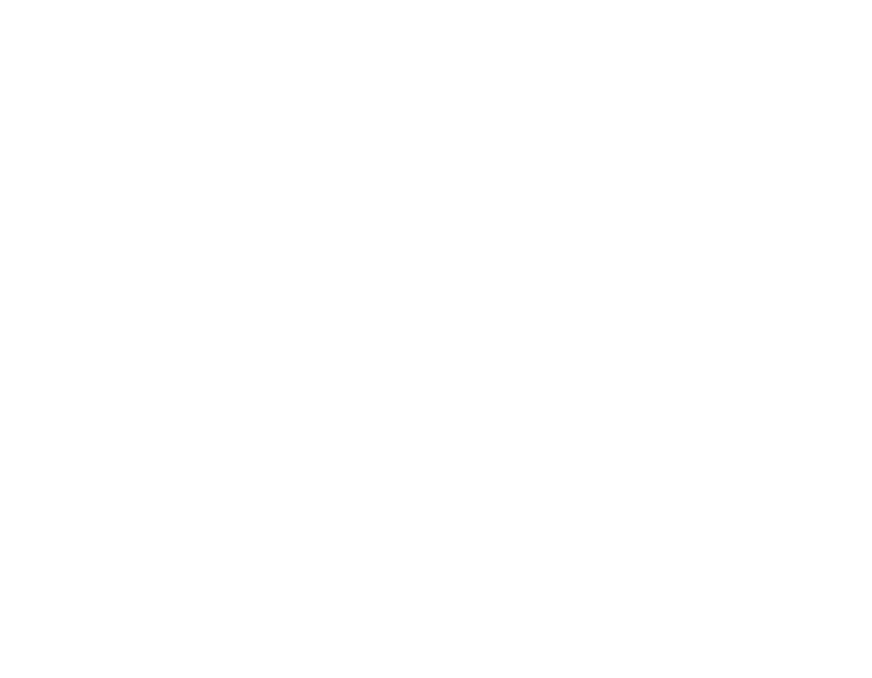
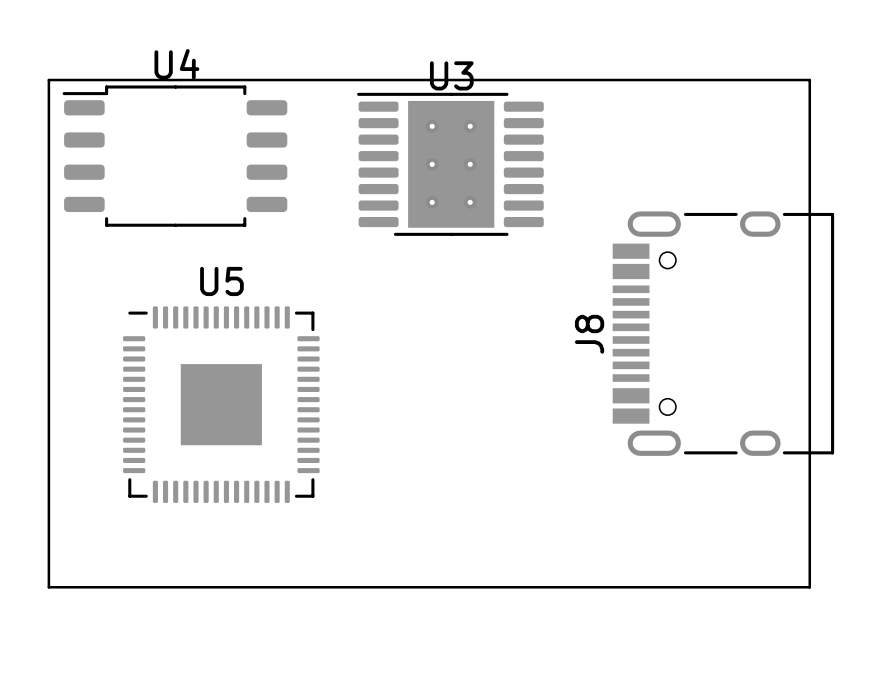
board edge: none -> (48, 80) (809, 80) (809, 587) (48, 587) (48, 80)
U4: none -> (174, 156)
U3: none -> (450, 164)
J8: none -> (723, 333)
U5: none -> (221, 404)

